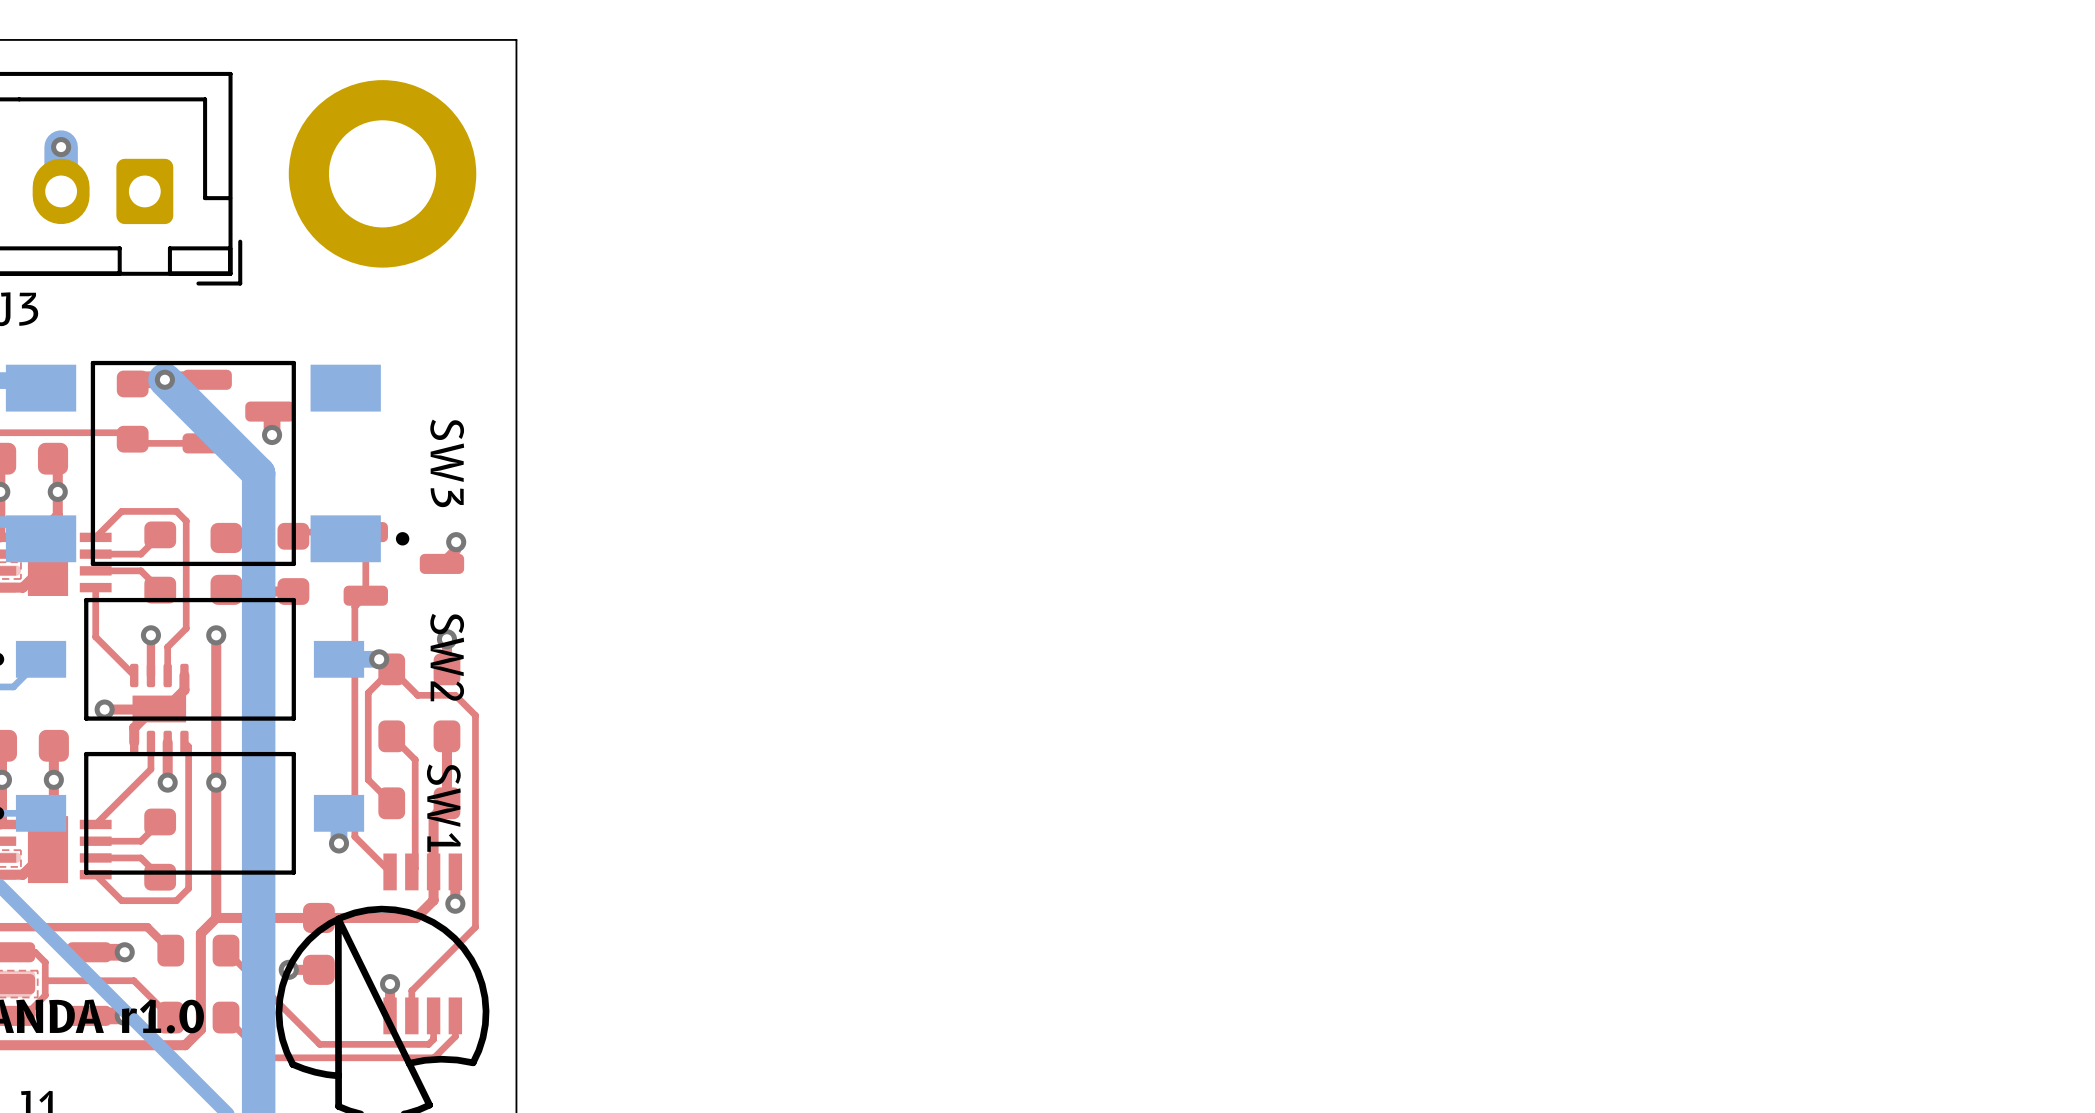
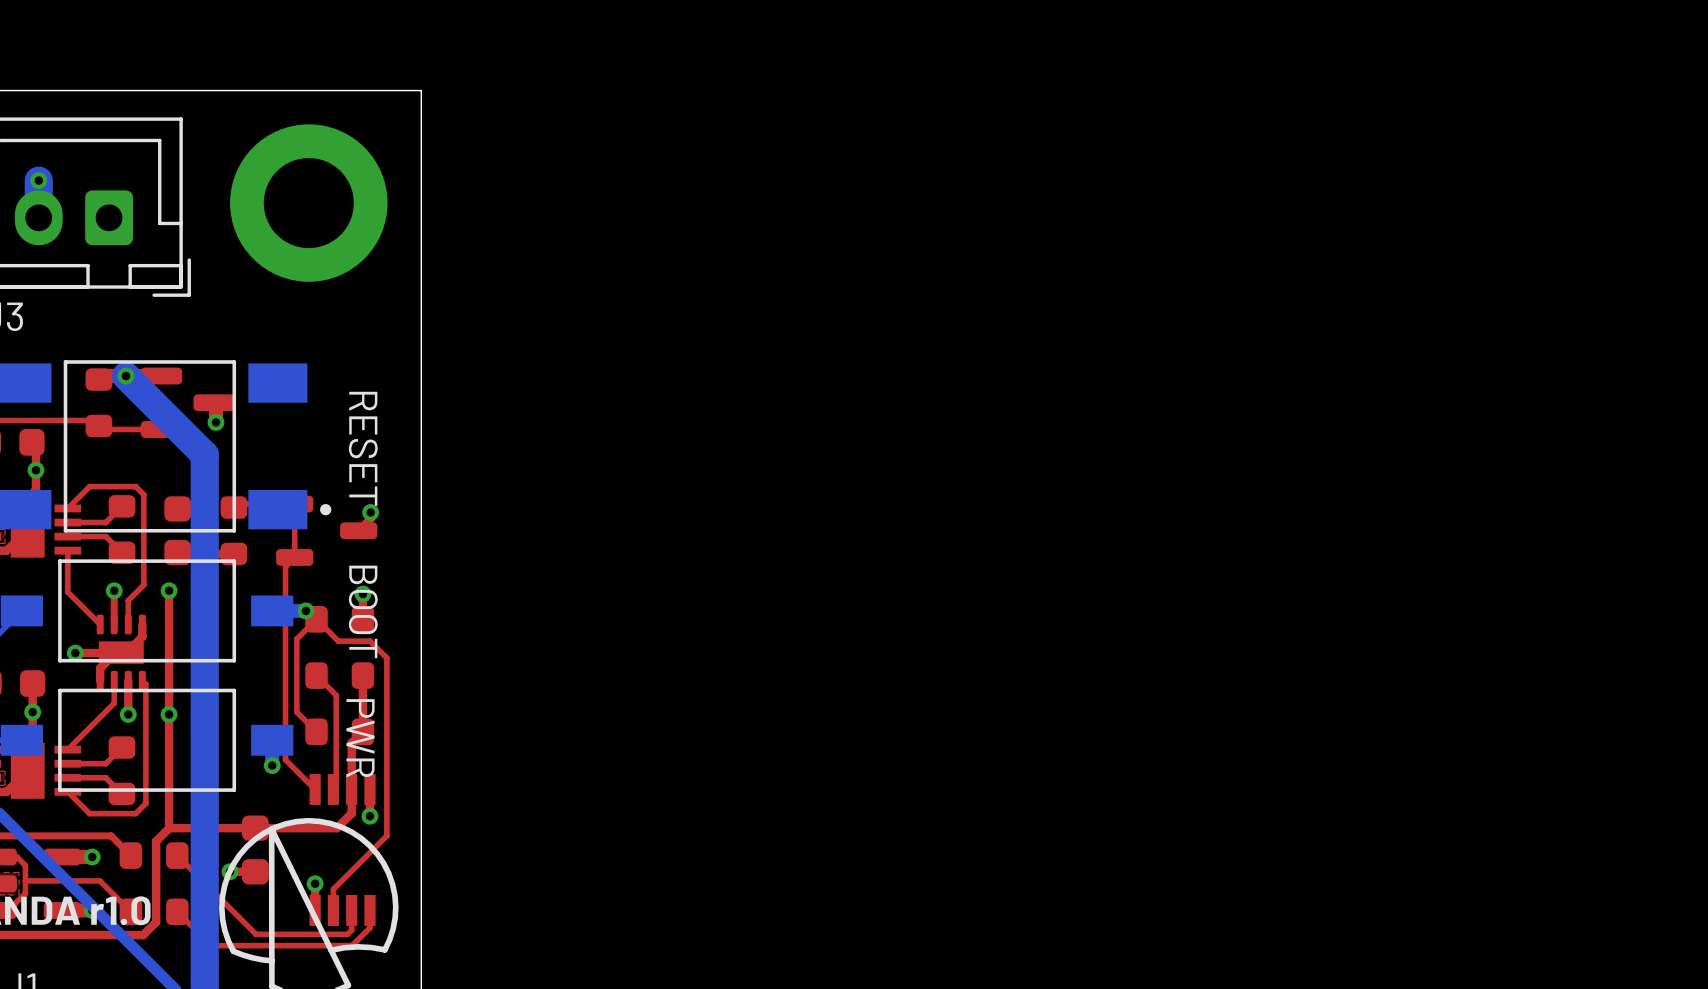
SW3 name: SW3 (447, 463) -> RESET (363, 448)
SW2 name: SW2 (447, 657) -> BOOT (363, 611)
SW1 name: SW1 (443, 808) -> PWR (360, 738)

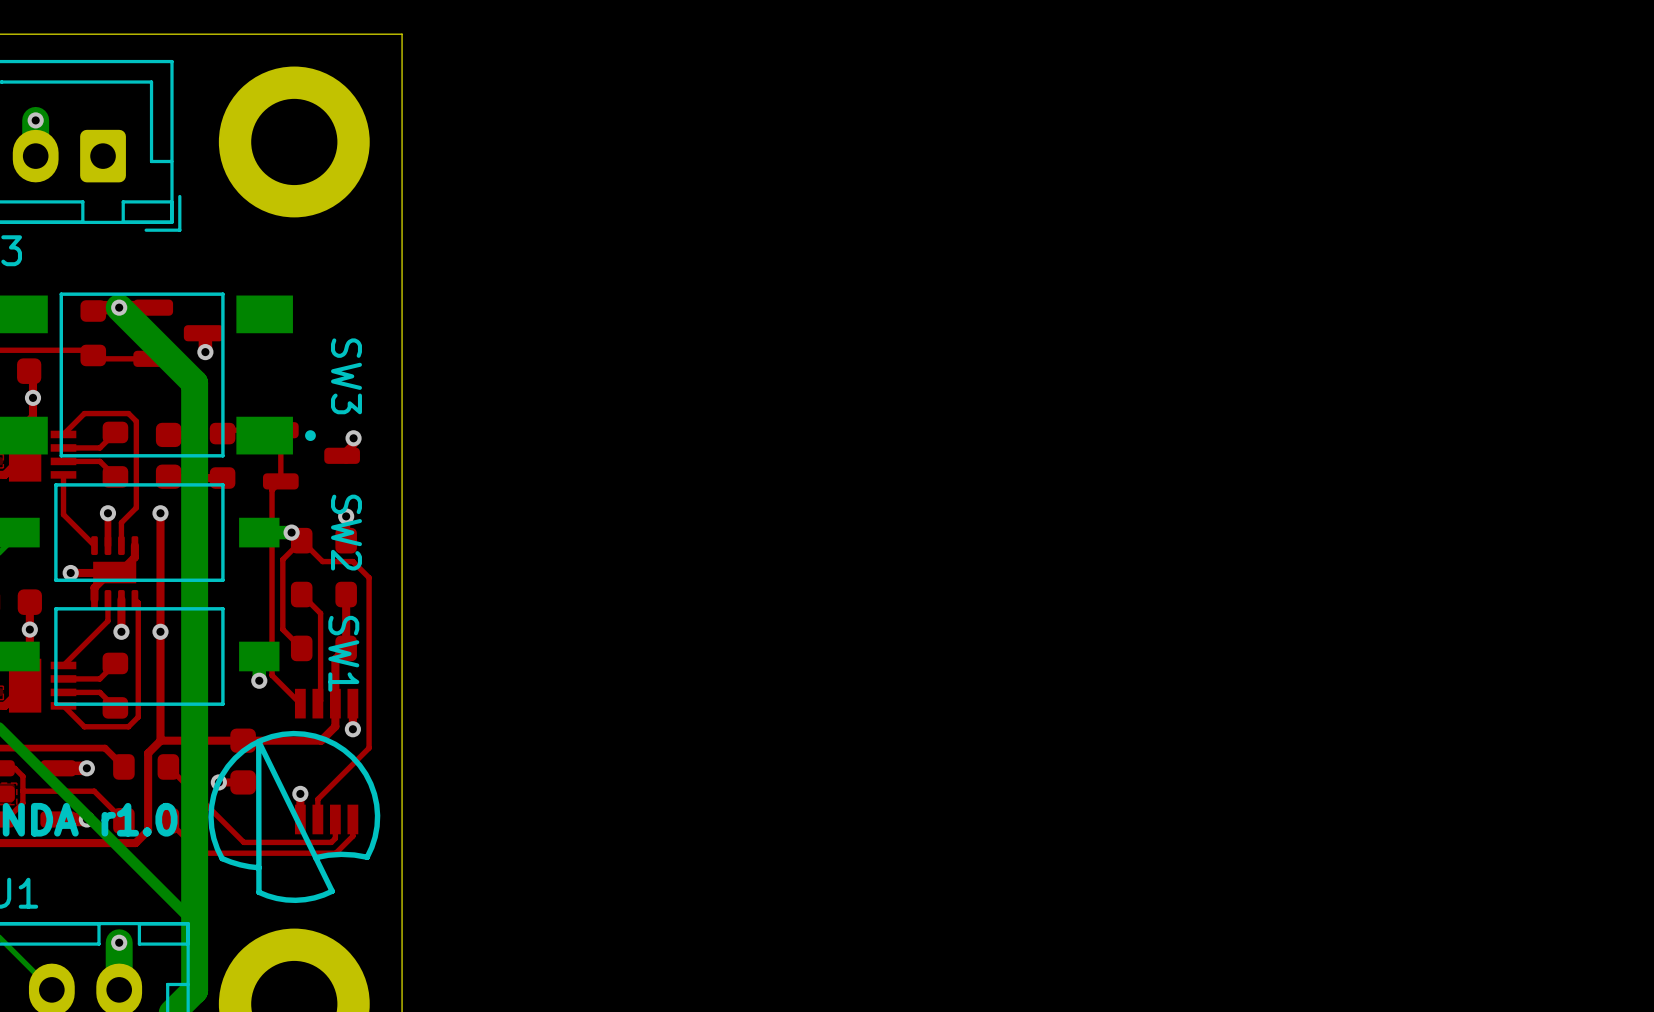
RESET name: RESET (363, 448) -> SW3 (346, 376)
BOOT name: BOOT (363, 611) -> SW2 (346, 532)
PWR name: PWR (360, 738) -> SW1 (343, 653)

